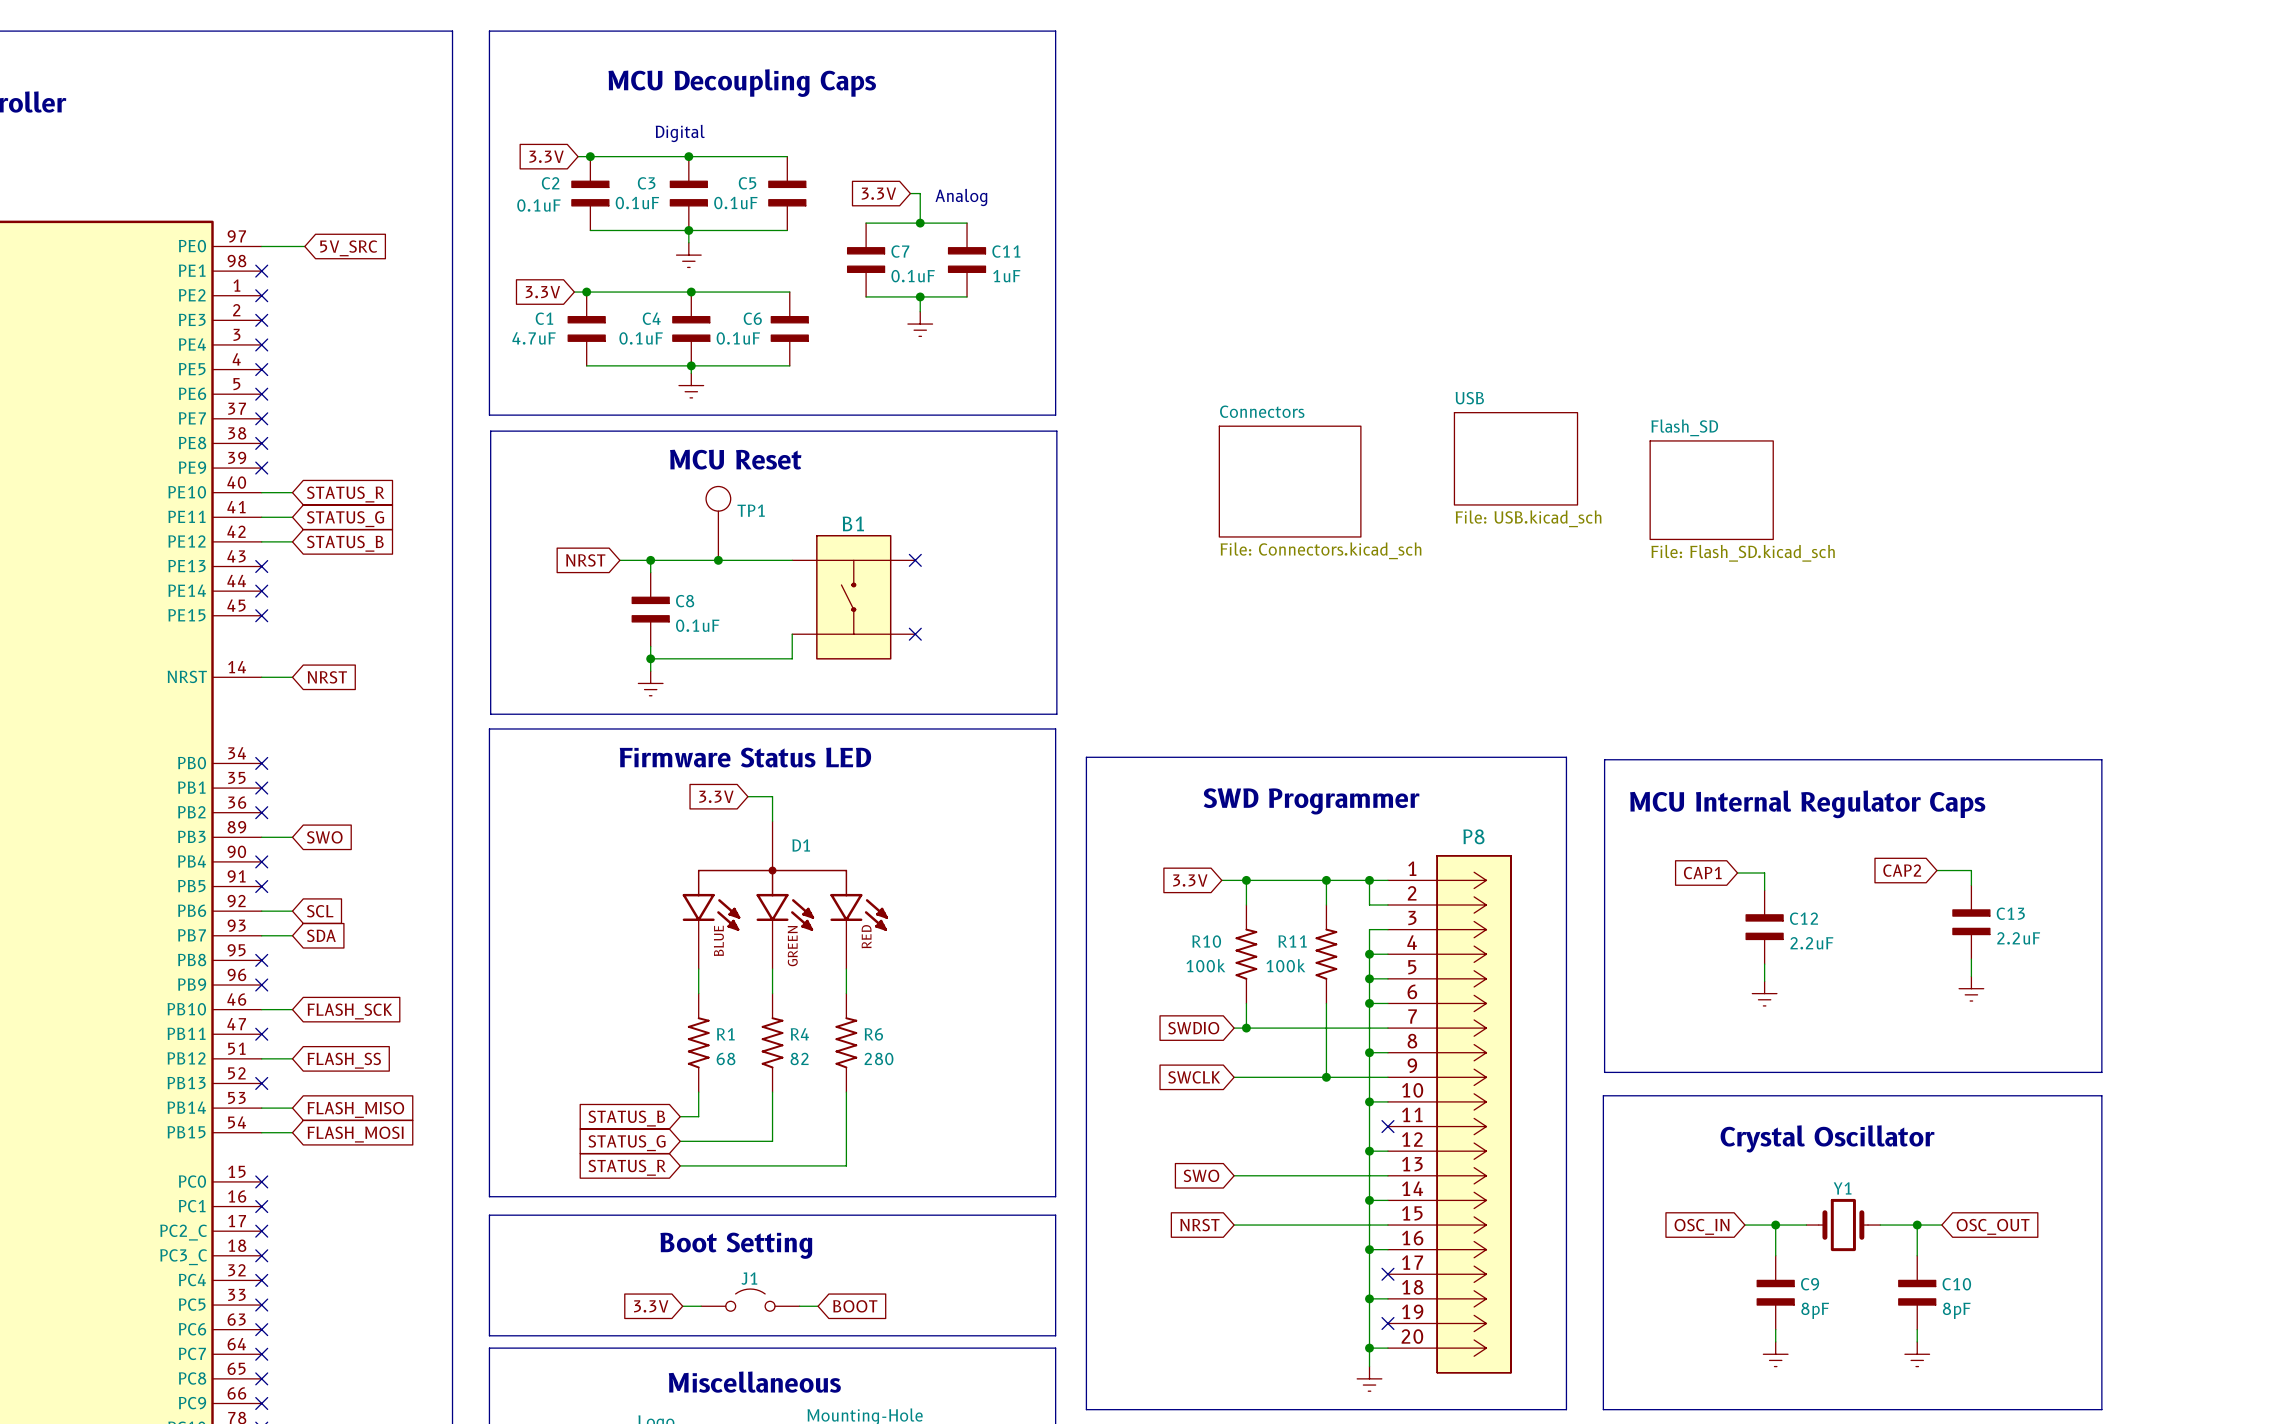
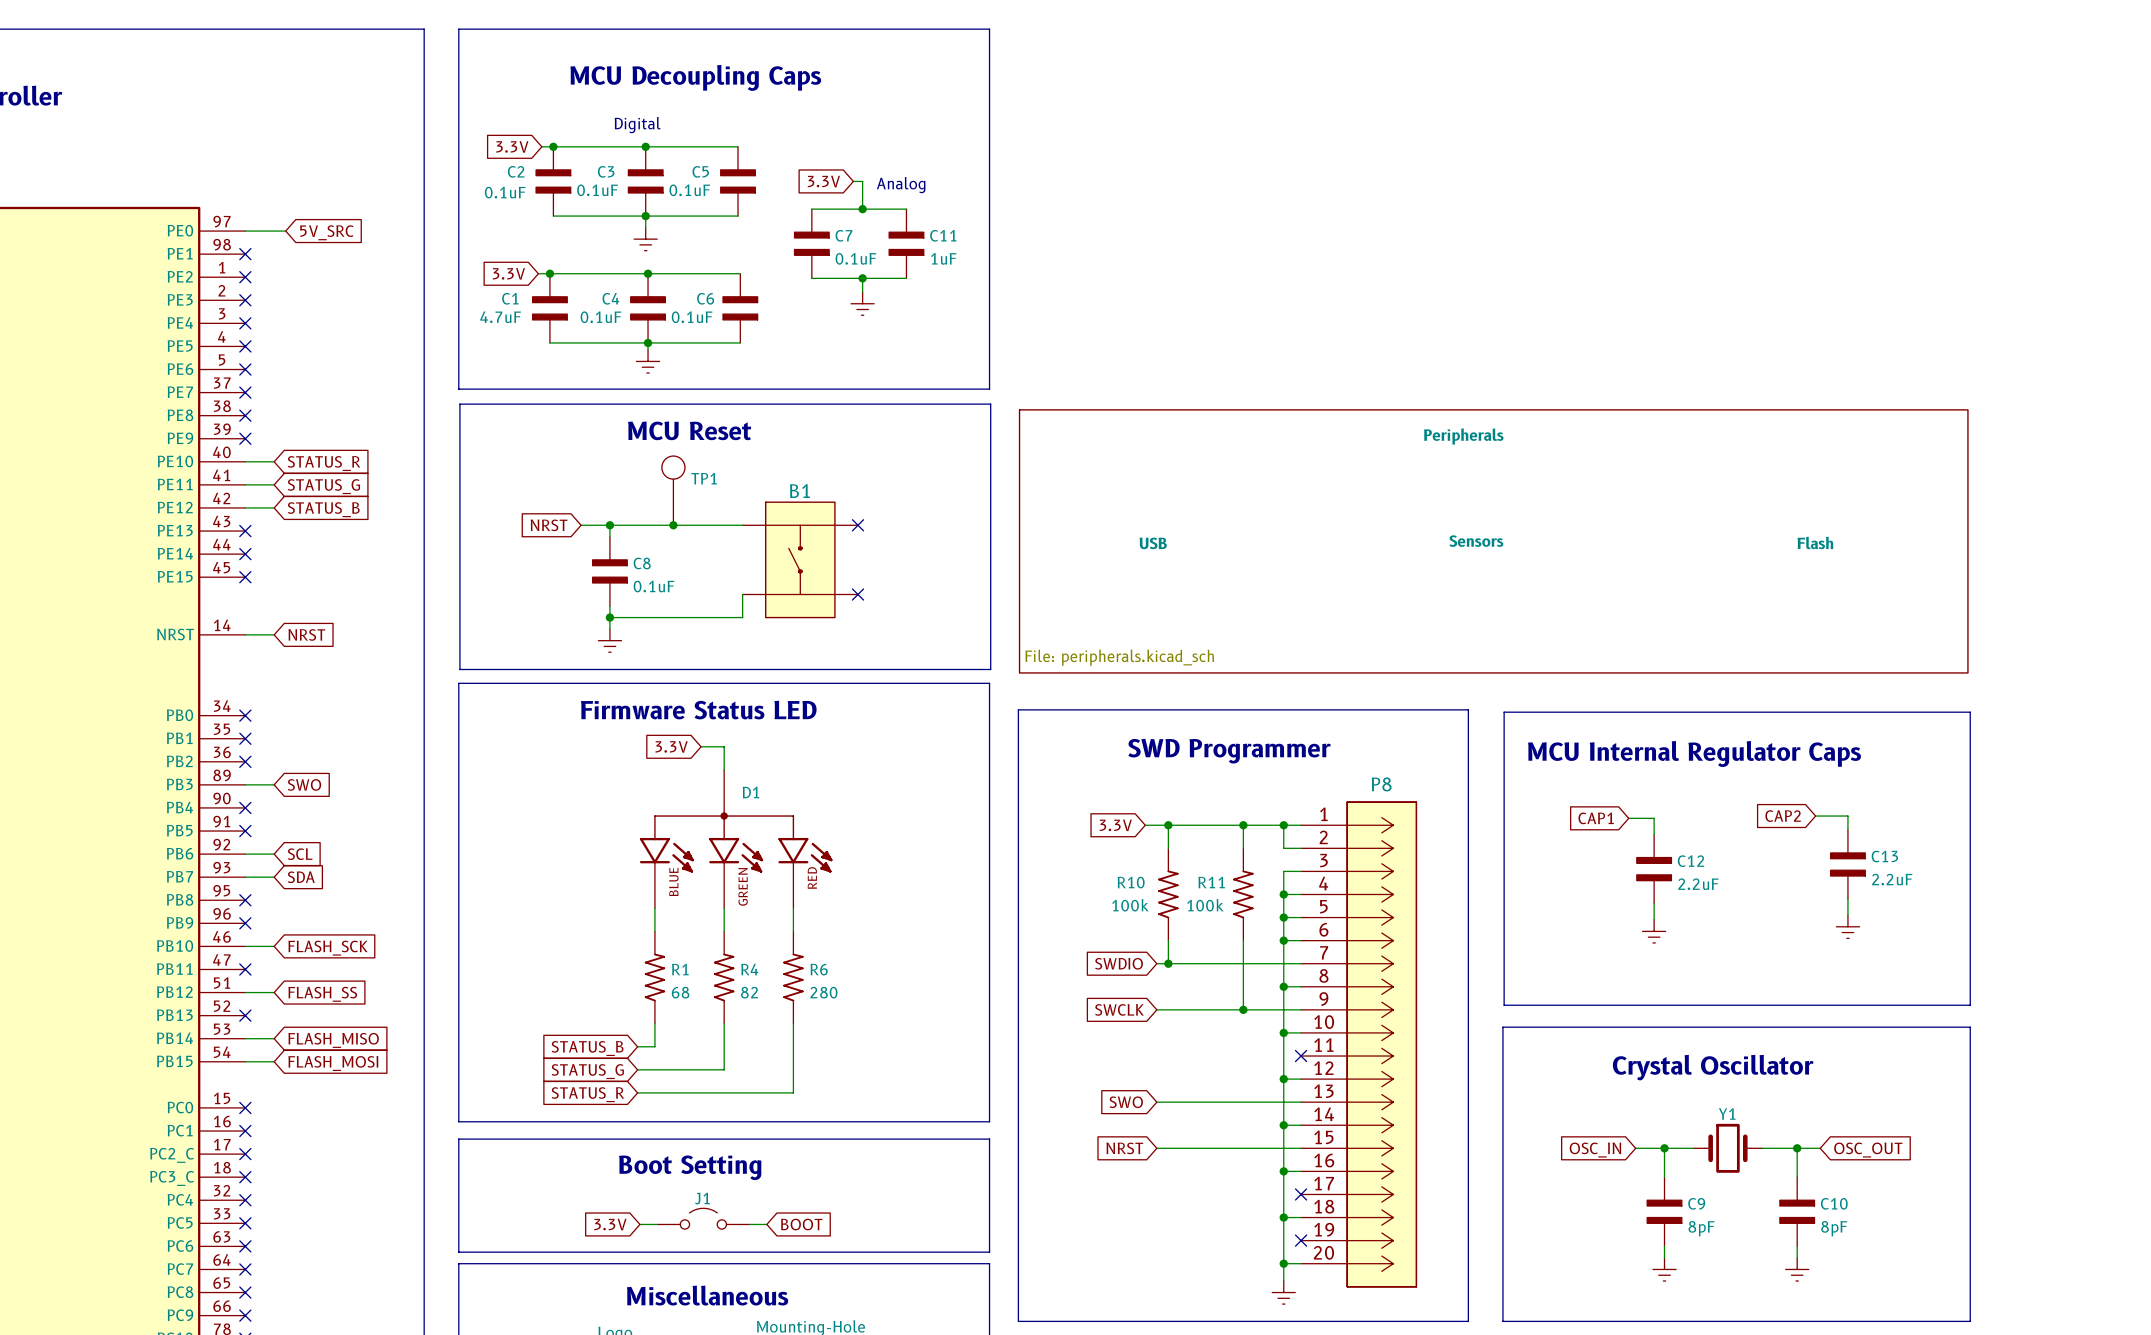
sheet USB: File: USB.kicad_sch (1515, 458) -> none
sheet Connectors: File: Connectors.kicad_sch (1290, 481) -> none
sheet Flash_SD: File: Flash_SD.kicad_sch (1711, 490) -> none
sheet Peripherals: none -> File: peripherals.kicad_sch (1493, 541)

